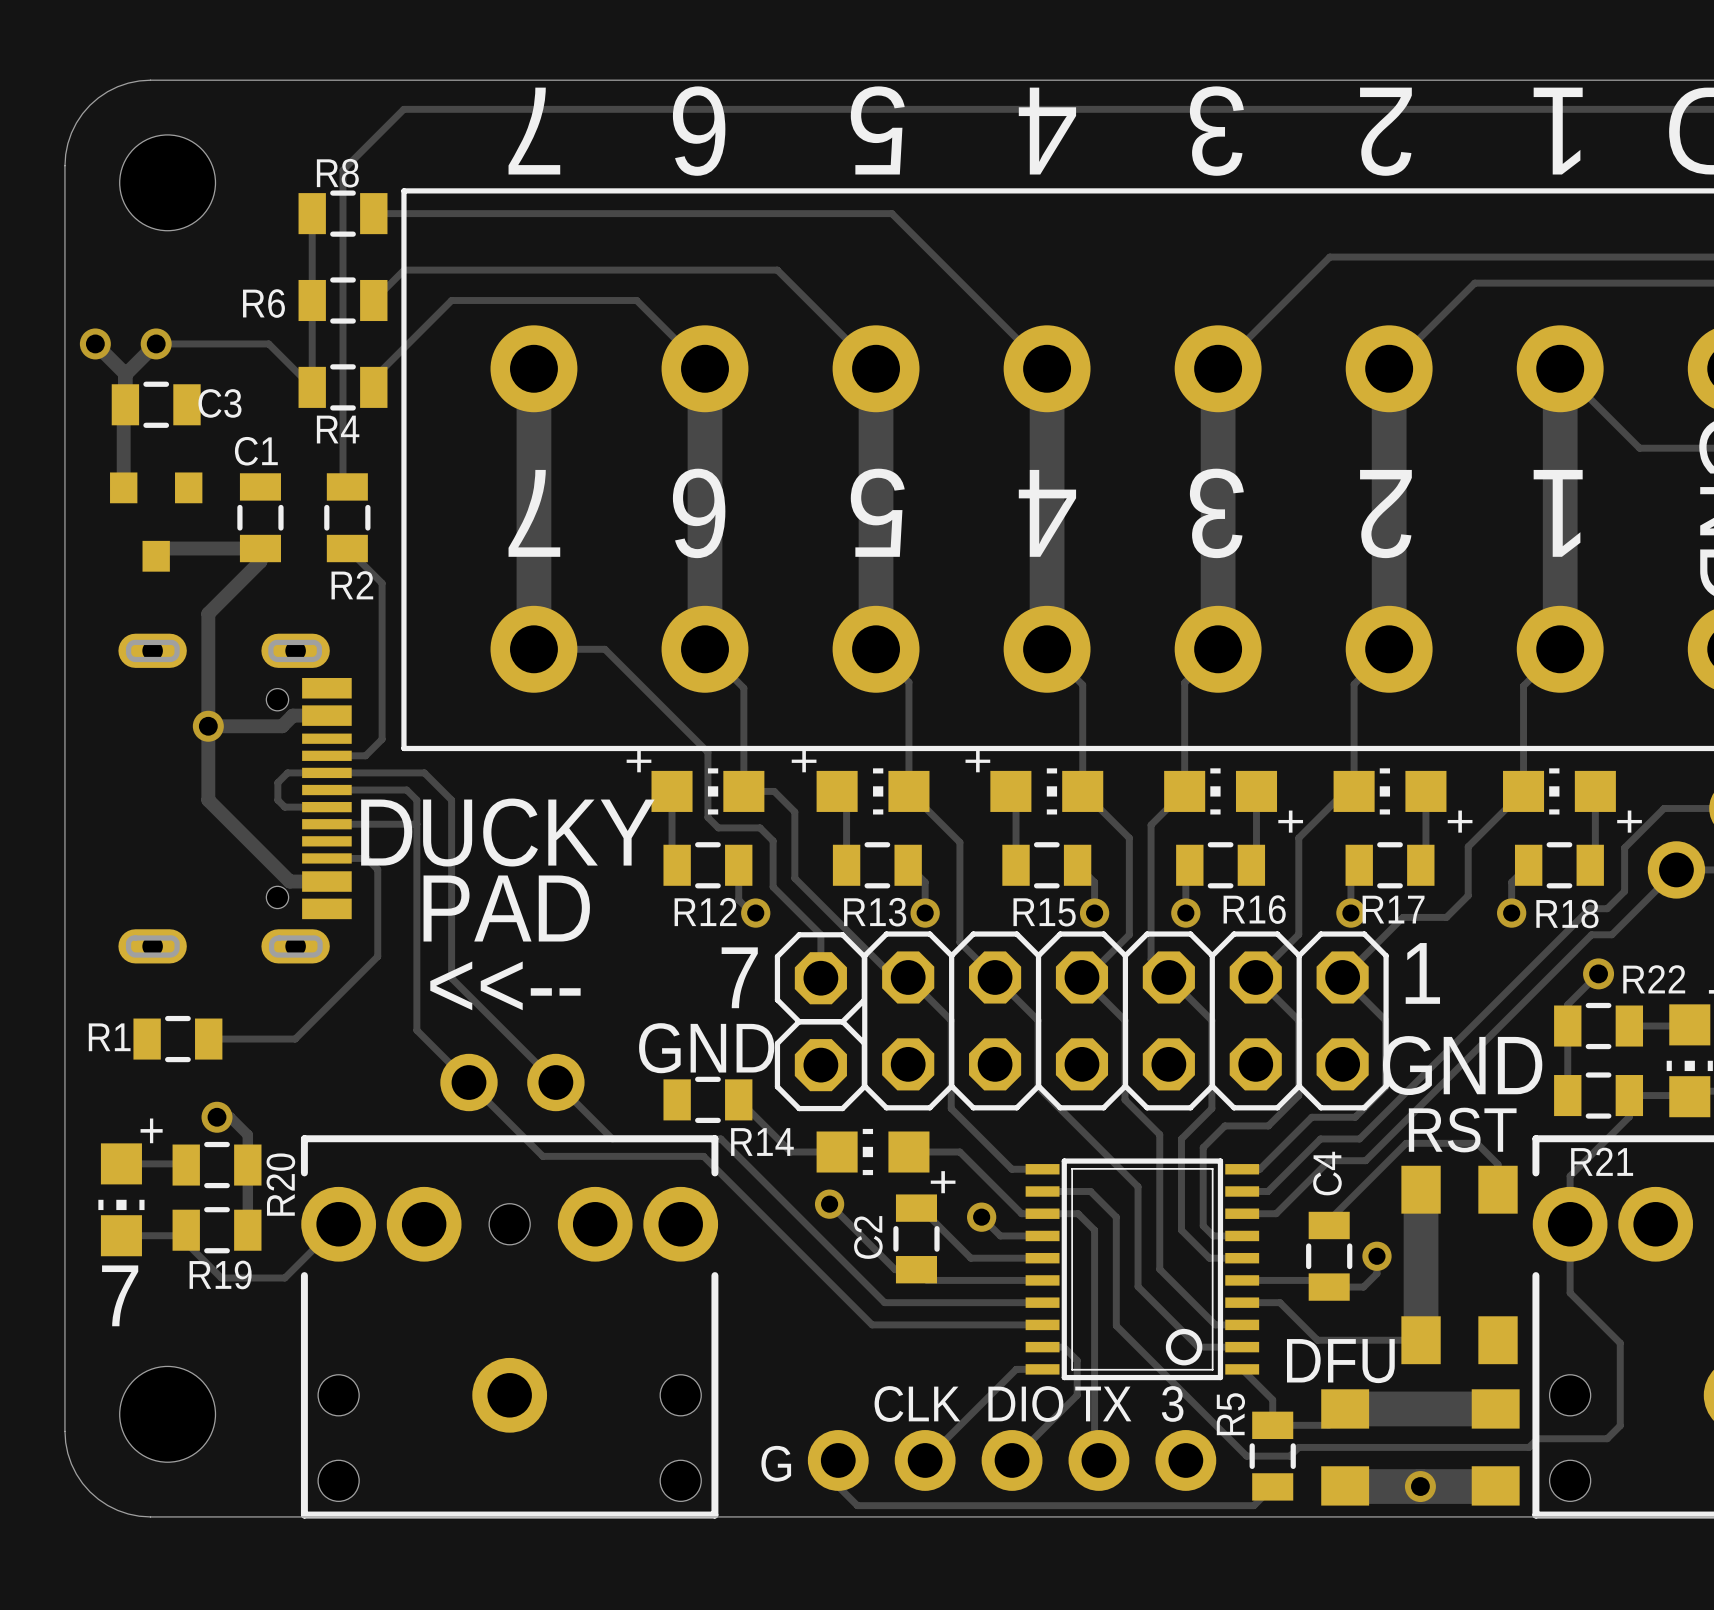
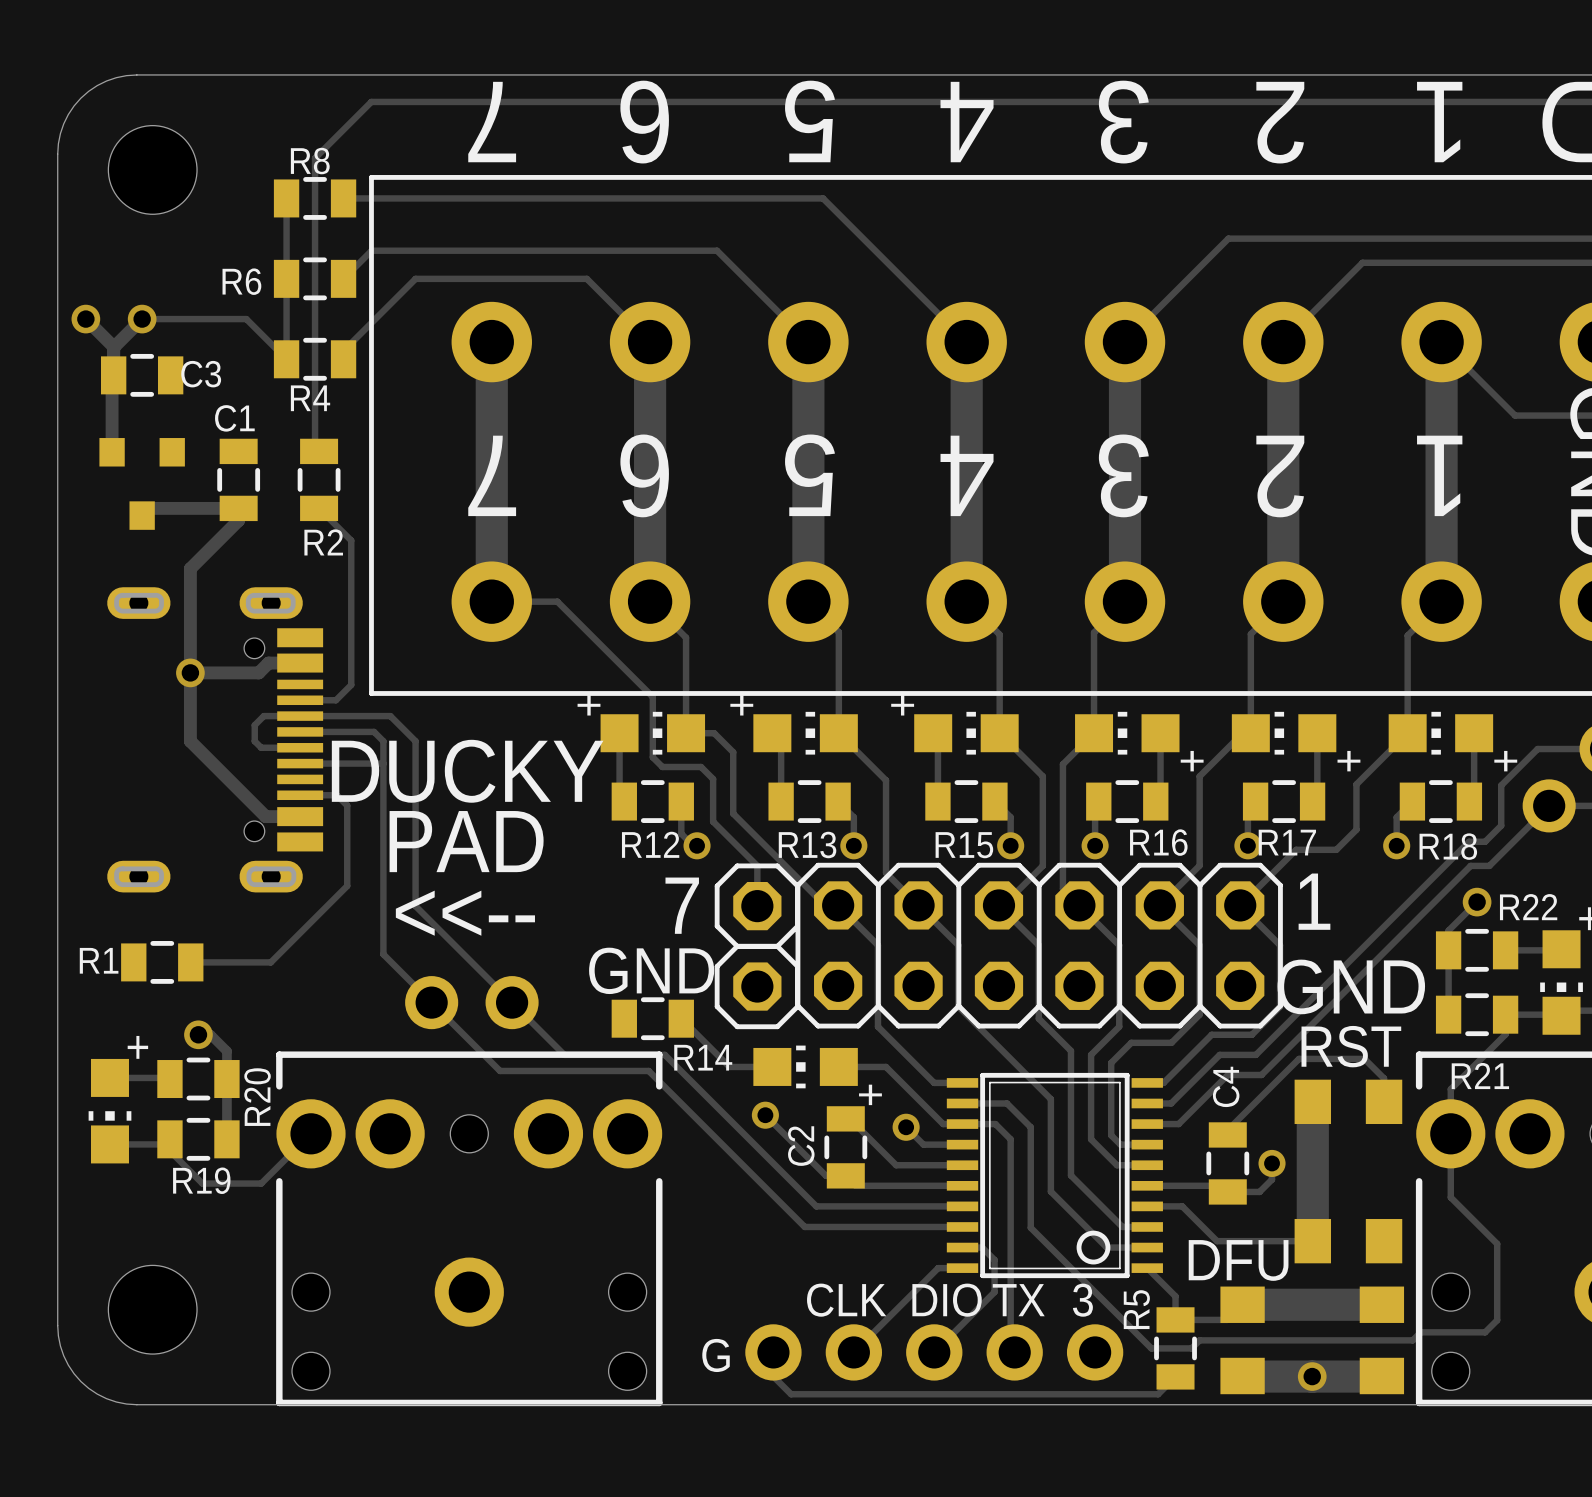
text: 7 (120, 1295) -> none

